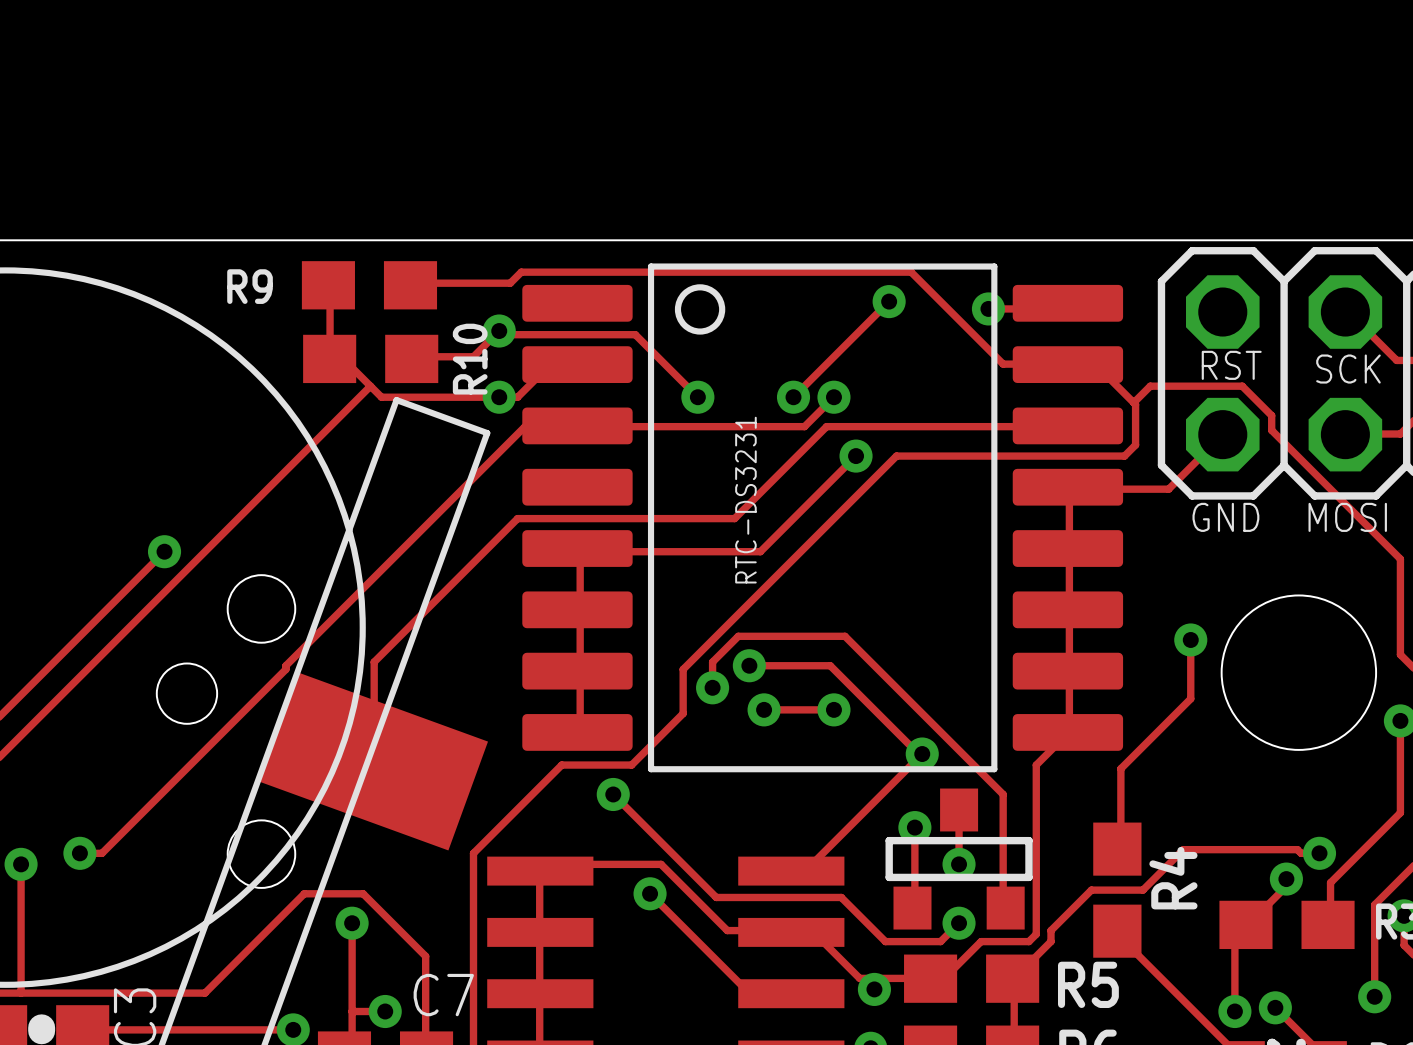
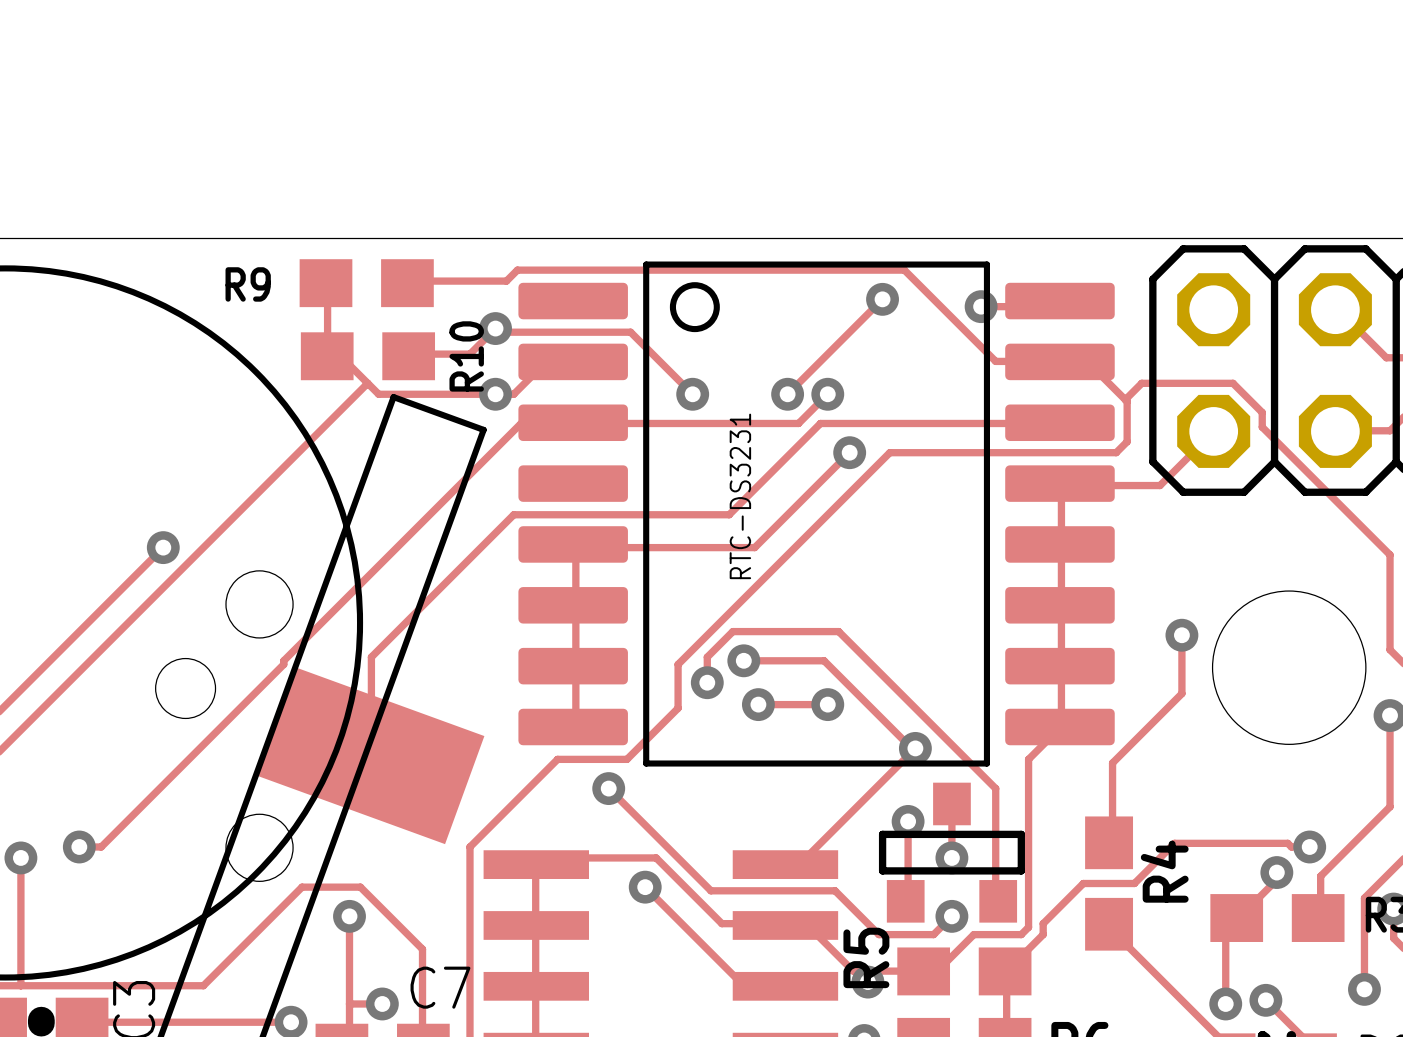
text: RST (1231, 365) -> none
text: SCK (1348, 369) -> none
text: GND (1225, 517) -> none
text: MOSI (1347, 517) -> none
R5 name rotation: 0° (1088, 984) -> 90° counterclockwise (866, 957)
R5 name position: R5 (1088, 984) -> R5 (866, 957)

